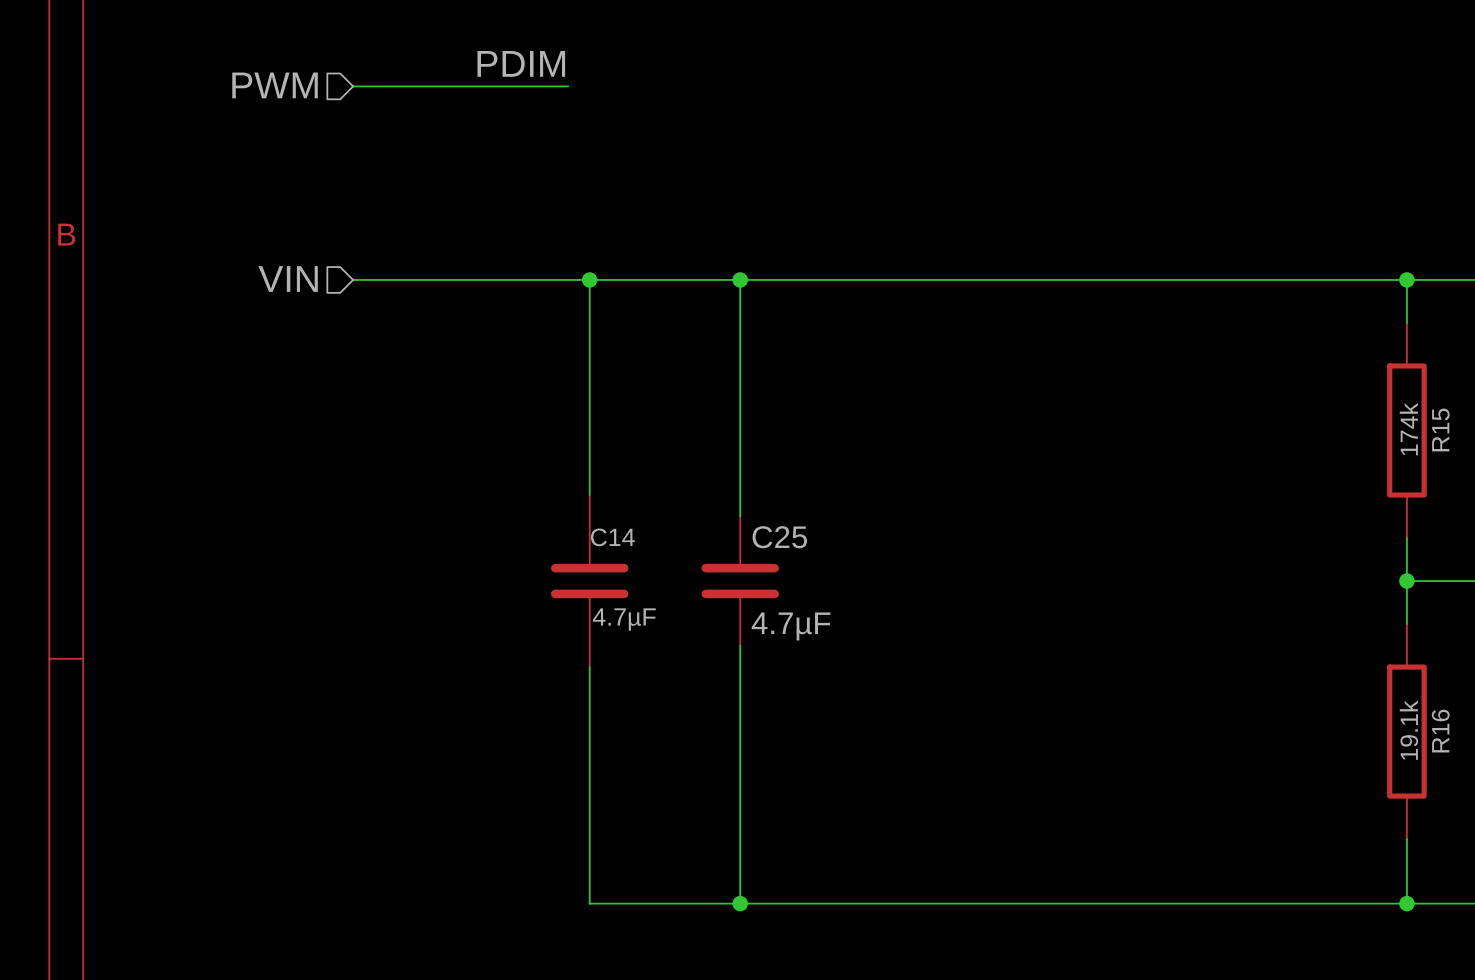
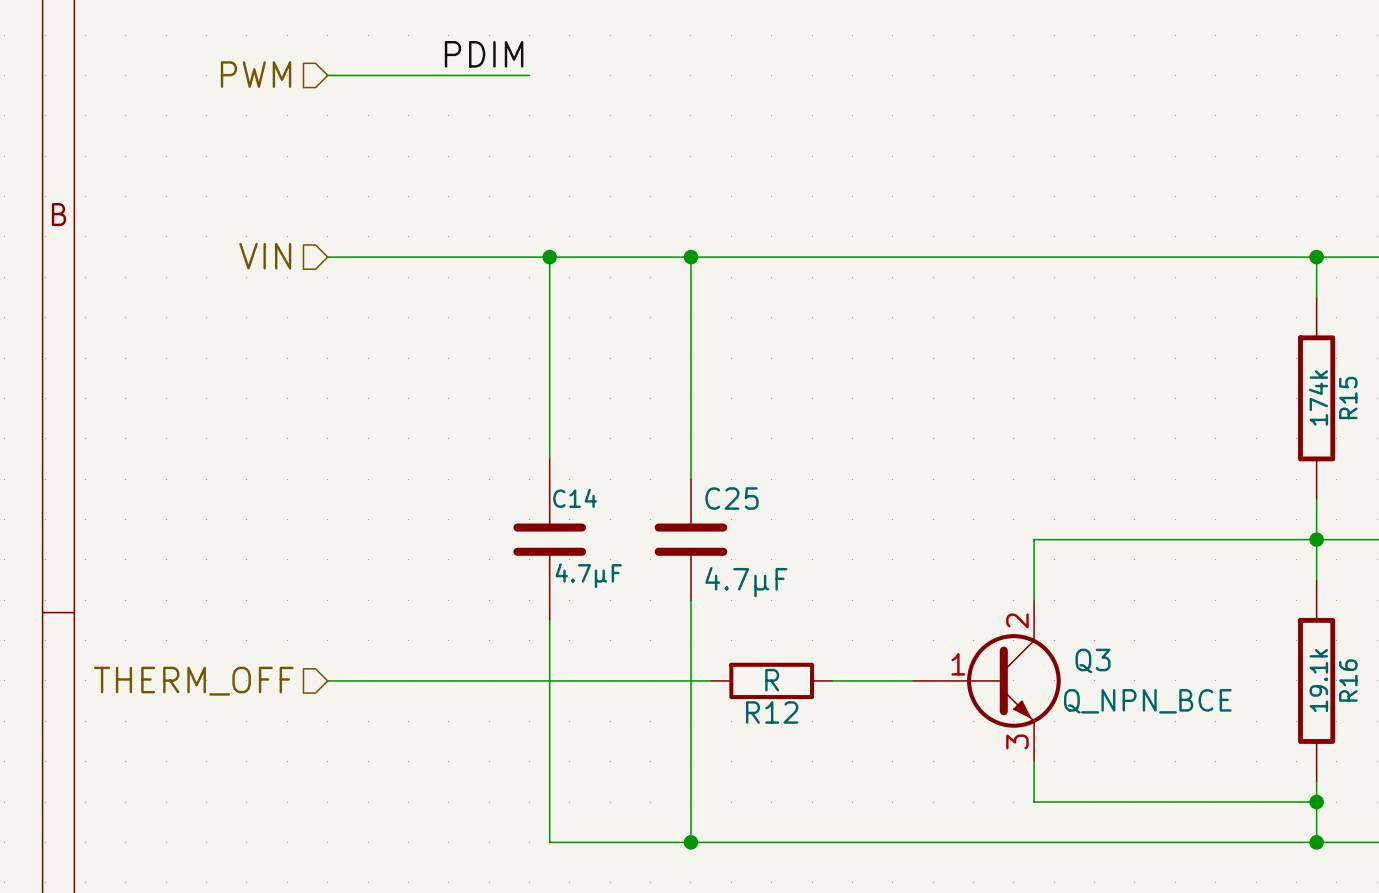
wire: none -> (1316, 539) (1034, 539) (1034, 600)
wire: none -> (327, 680) (711, 680)
R12: none -> R (771, 680)
wire: none -> (832, 680) (912, 680)
Q3: none -> Q_NPN_BCE (986, 680)
hierarchical label: none -> THERM_OFF (193, 681)
wire: none -> (1034, 761) (1034, 802) (1316, 802)
junction: none -> (1316, 802)

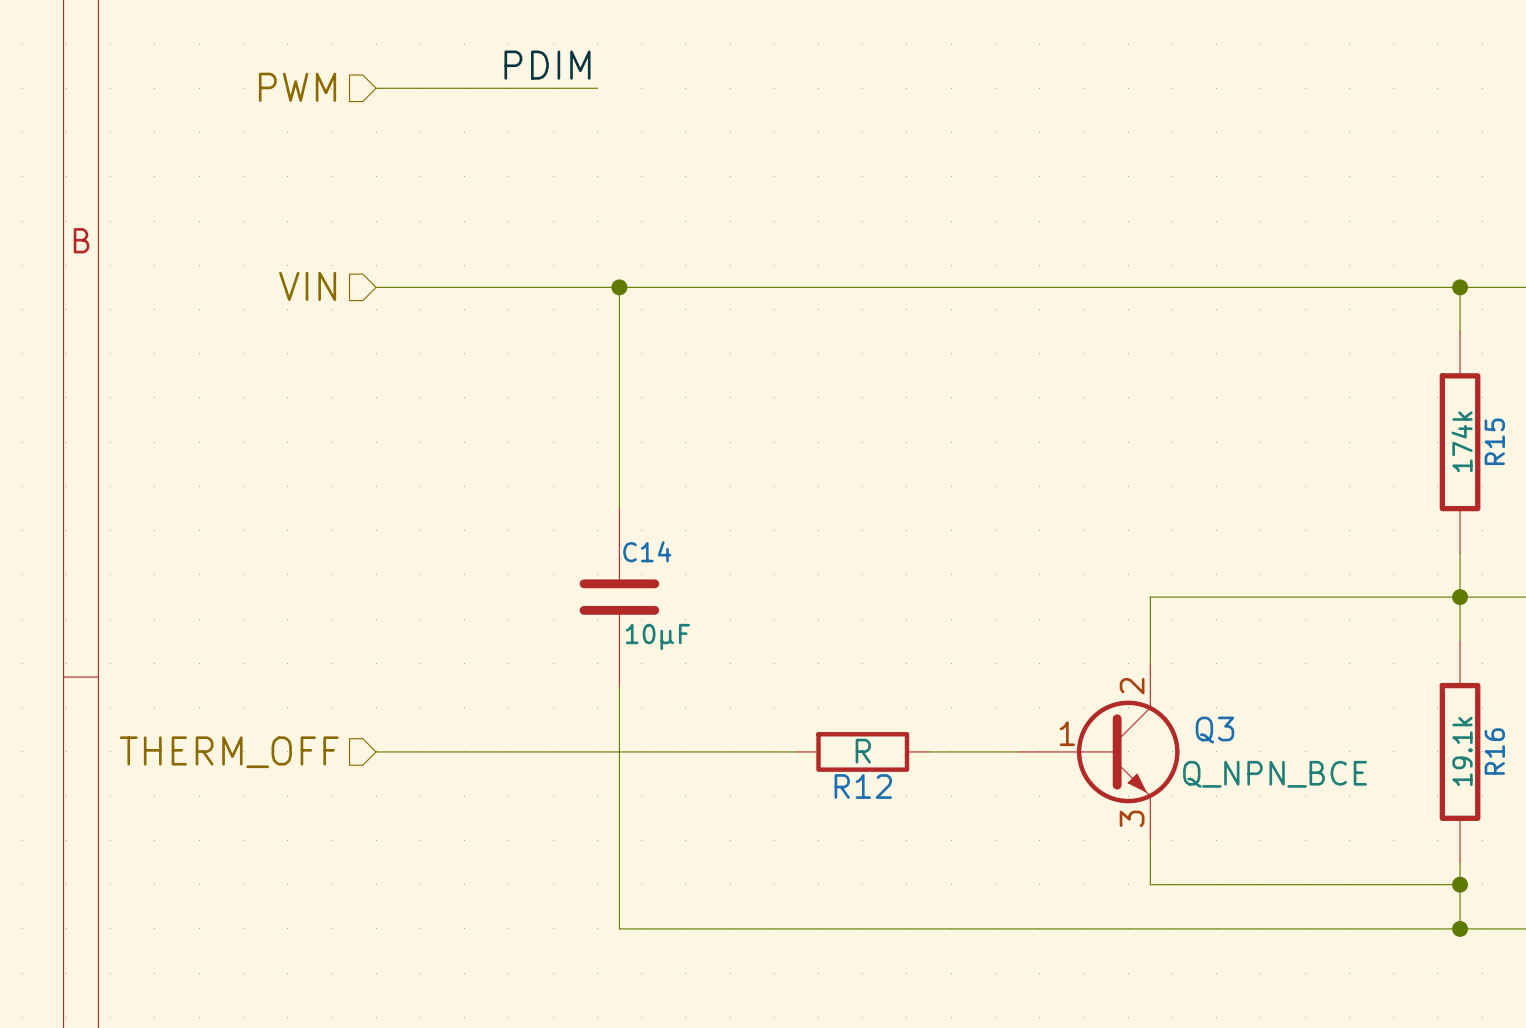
wire: (690, 257) (690, 479) -> none
junction: (690, 257) -> none
C25: 4.7µF (690, 539) -> none
C14 value: 4.7µF (588, 575) -> 10µF (657, 636)
wire: (690, 600) (690, 842) -> none
junction: (690, 842) -> none

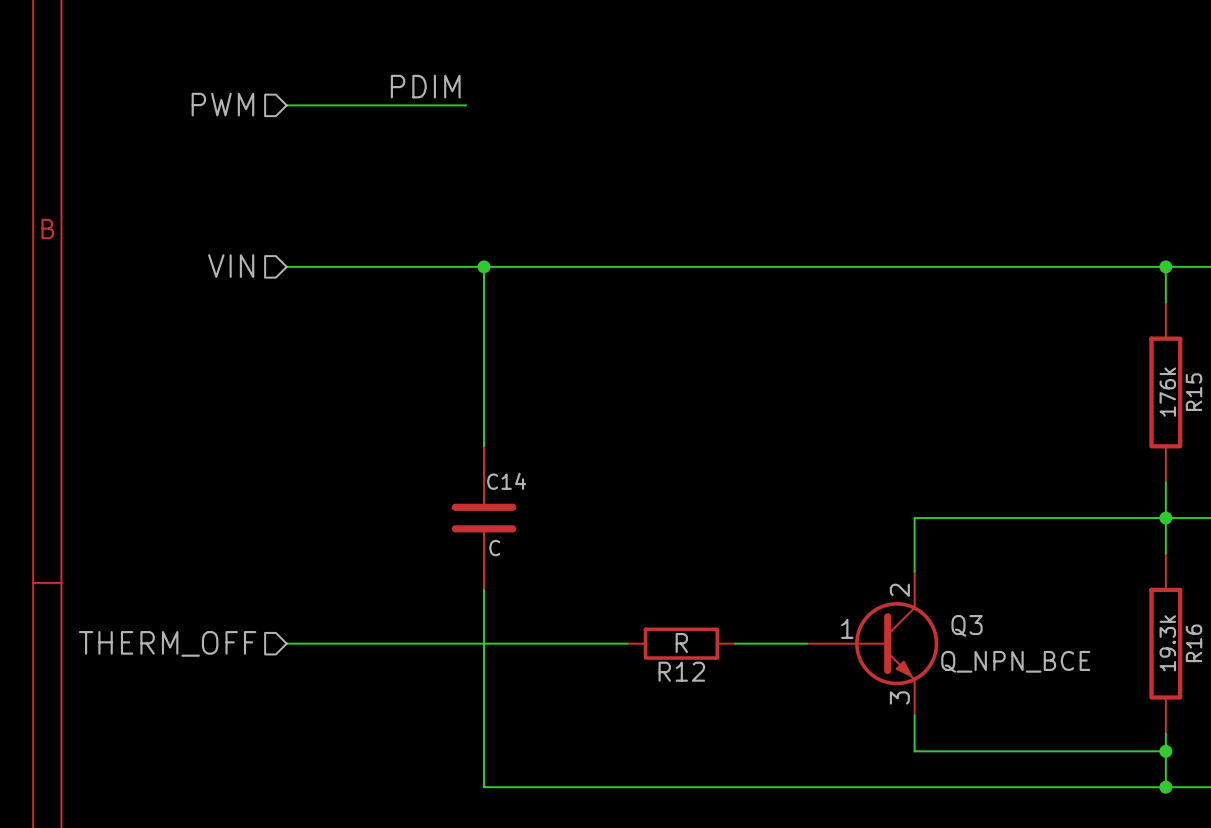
R15 value: 174k (1462, 441) -> 176k (1167, 392)
C14 value: 10µF (657, 636) -> C (494, 548)
R16 value: 19.1k (1462, 751) -> 19.3k (1167, 643)

